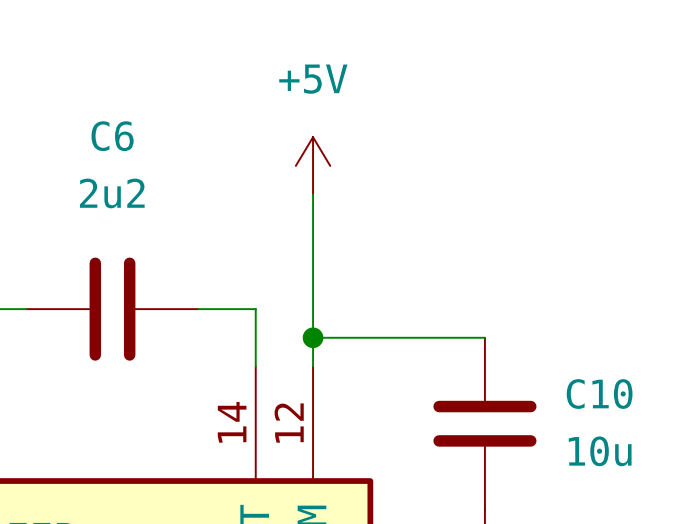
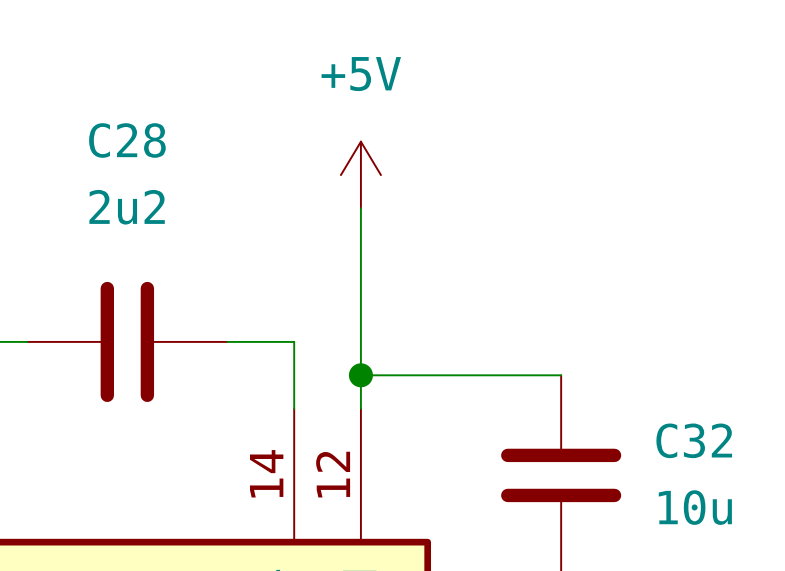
C6 name: C6 (112, 136) -> C28 (127, 140)
C10 name: C10 (599, 394) -> C32 (694, 440)

